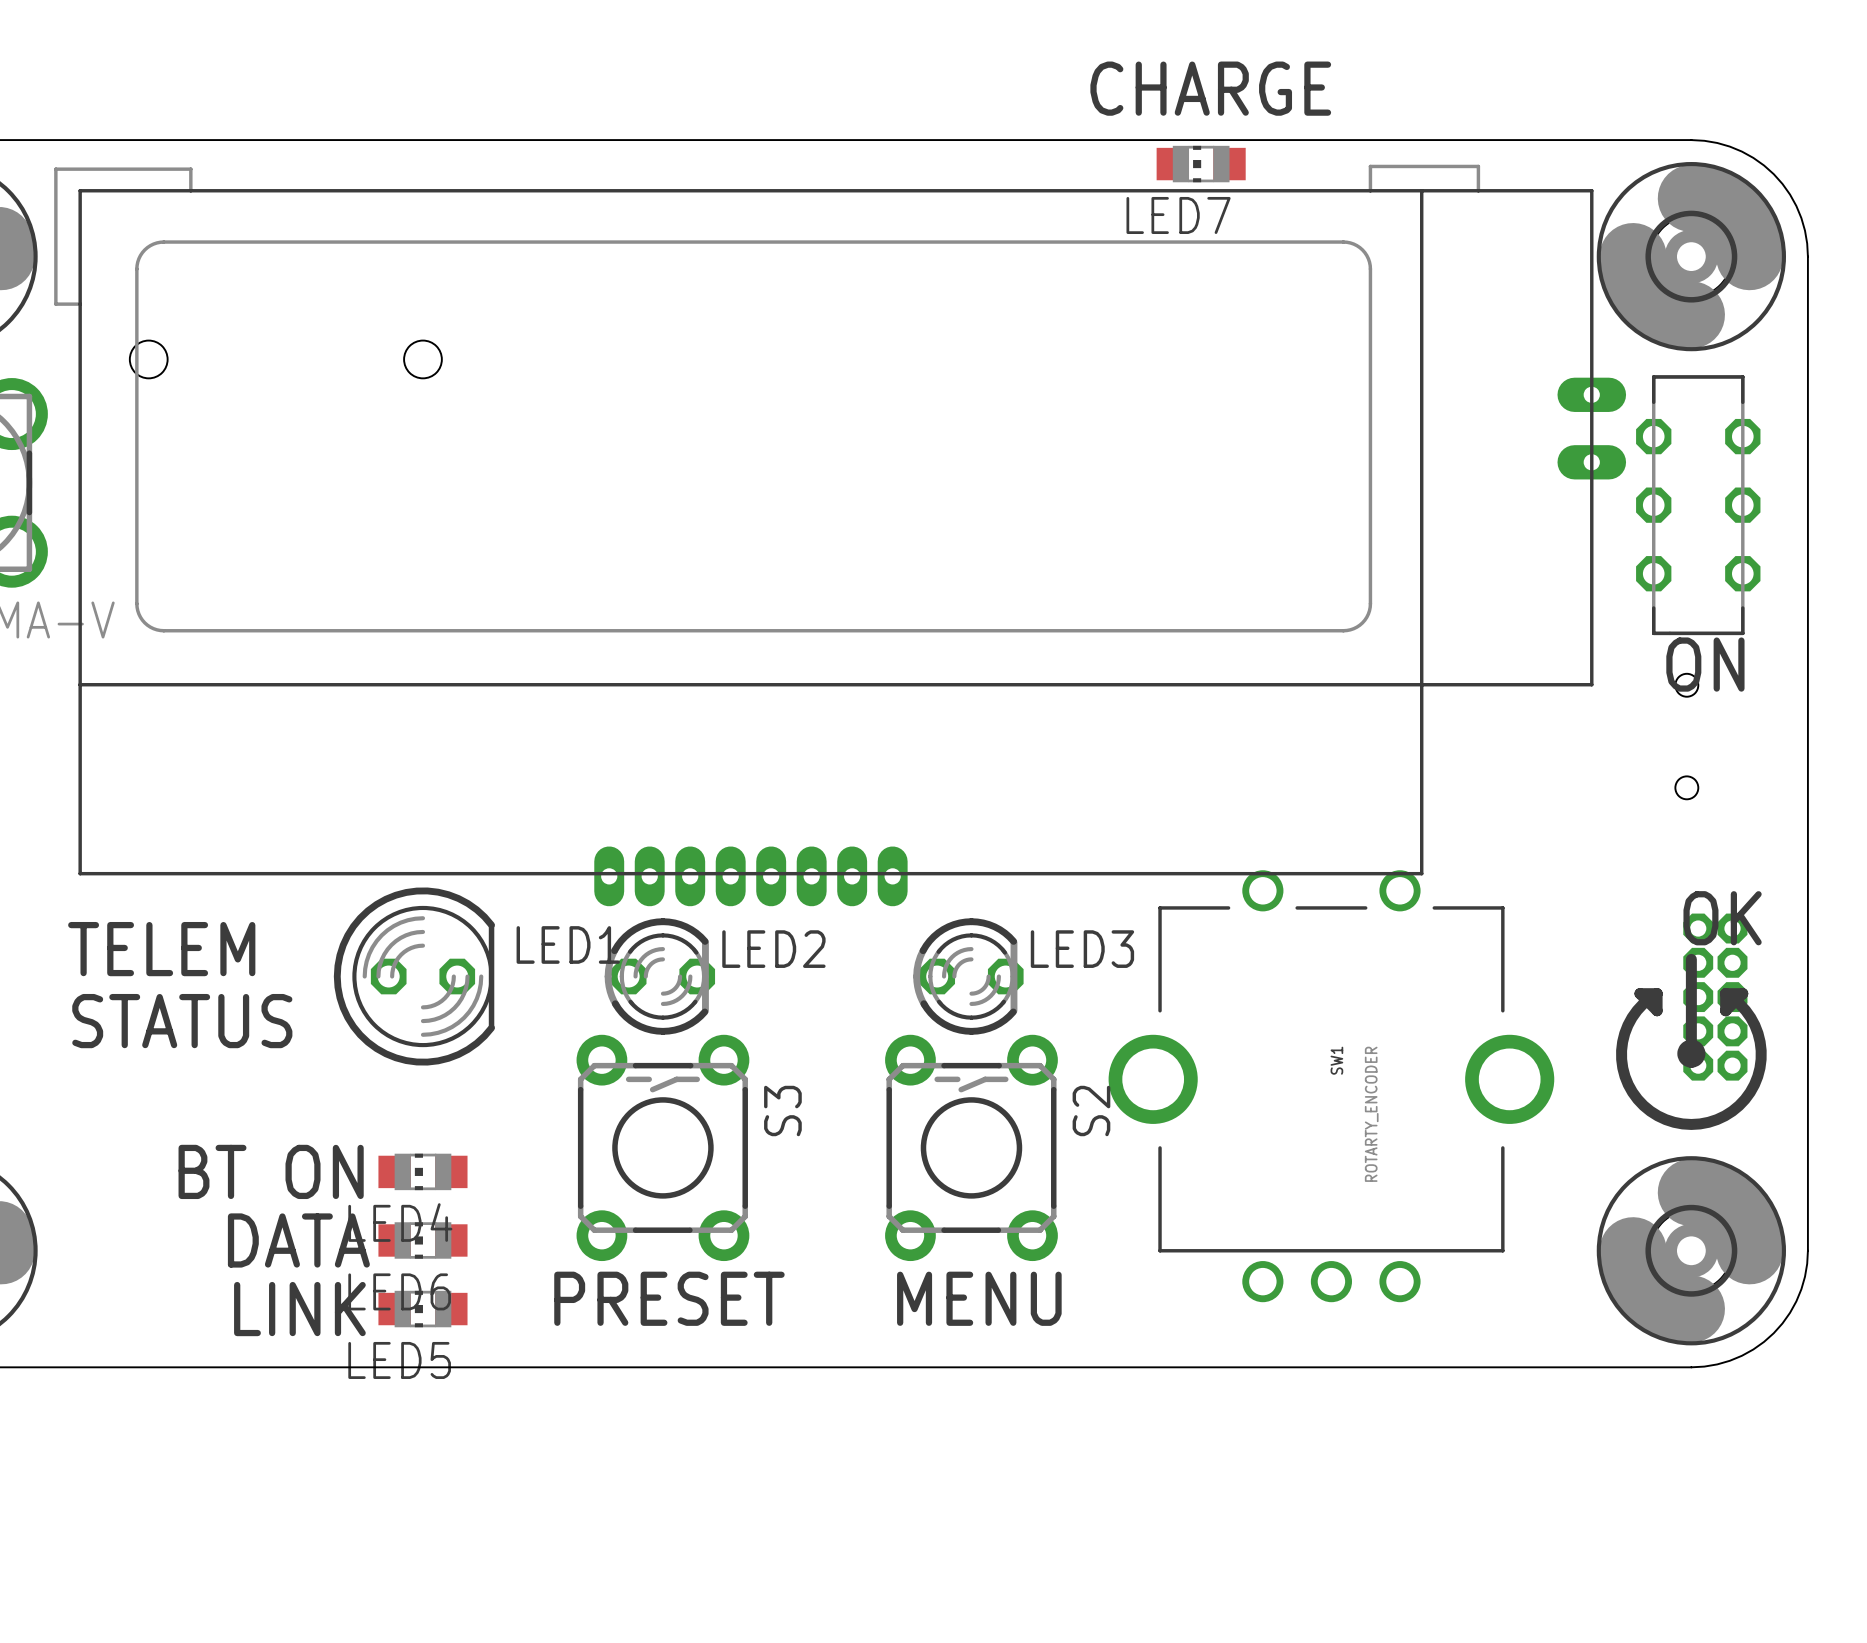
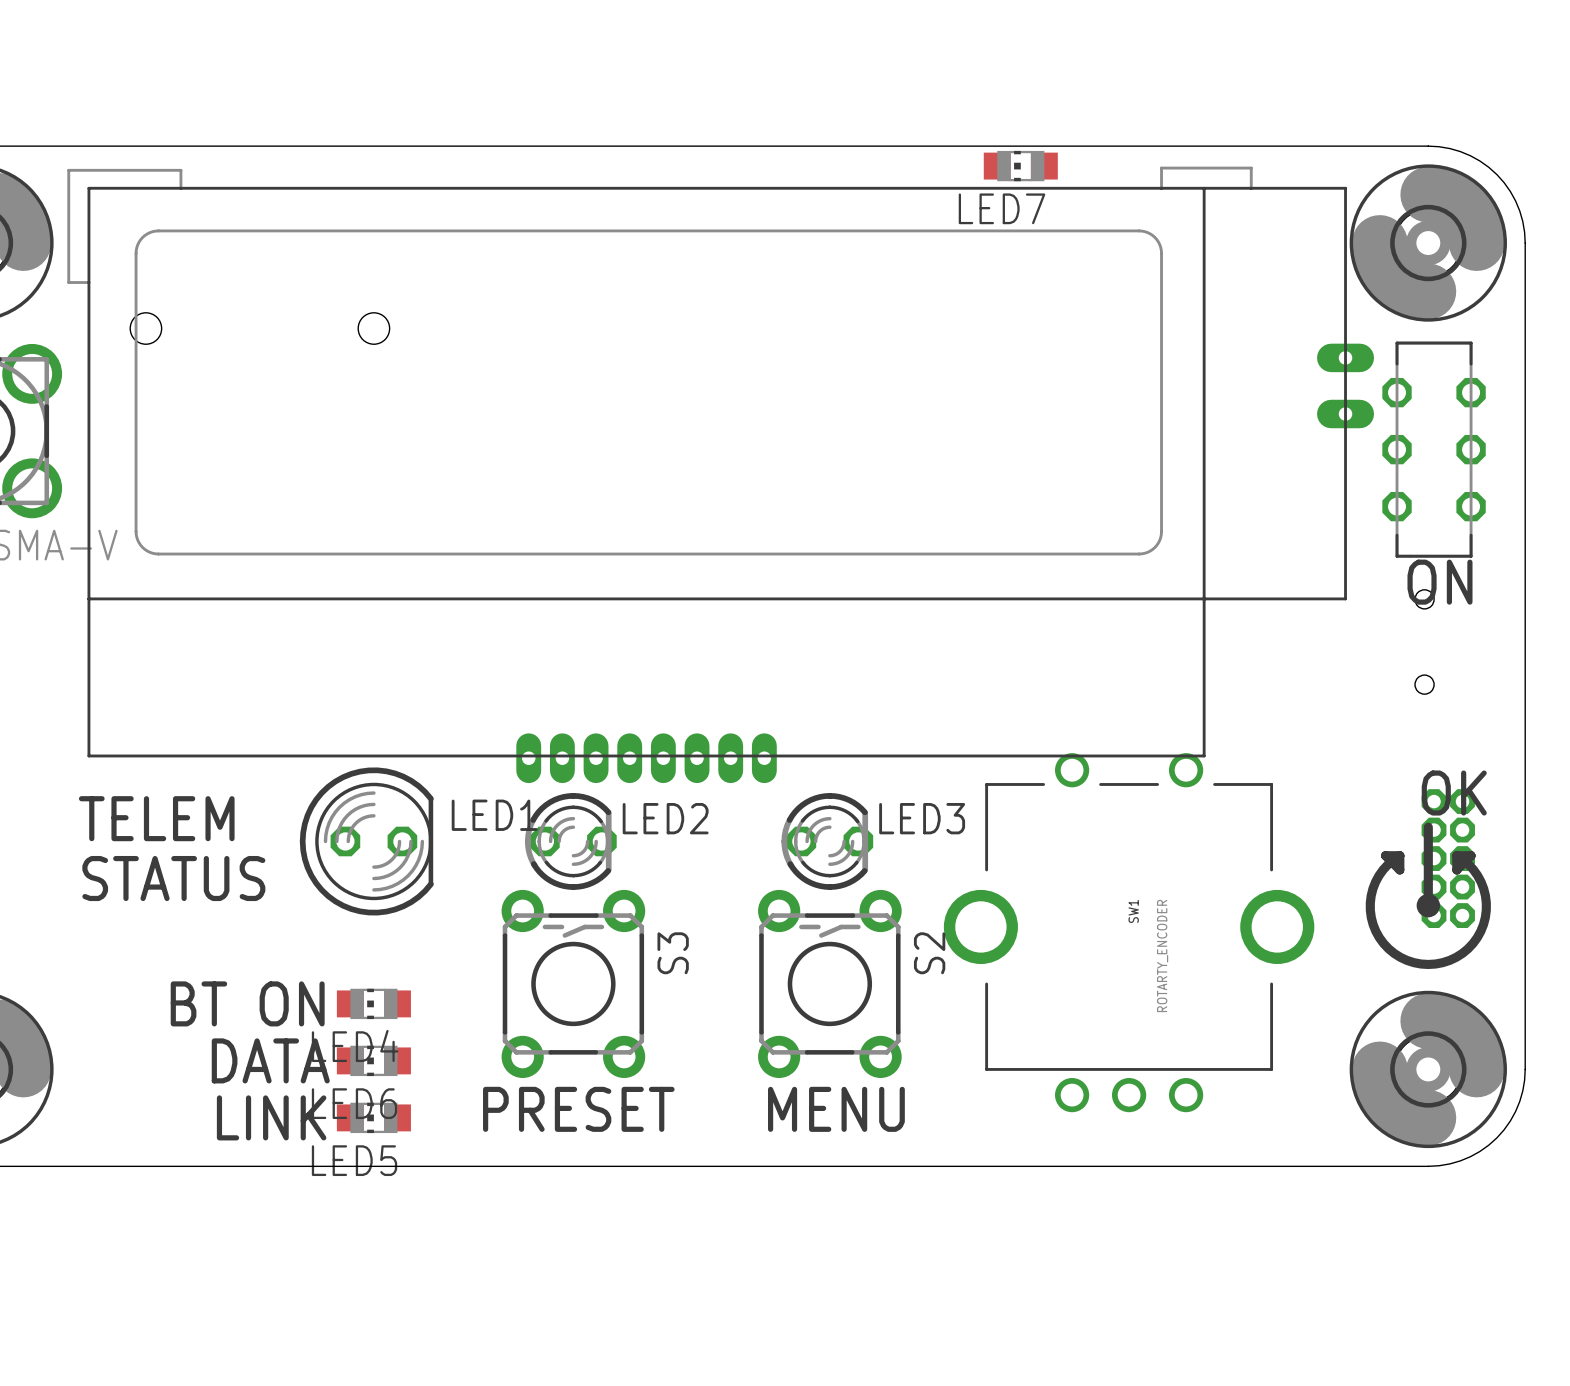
text: CHARGE (1210, 88) -> none

